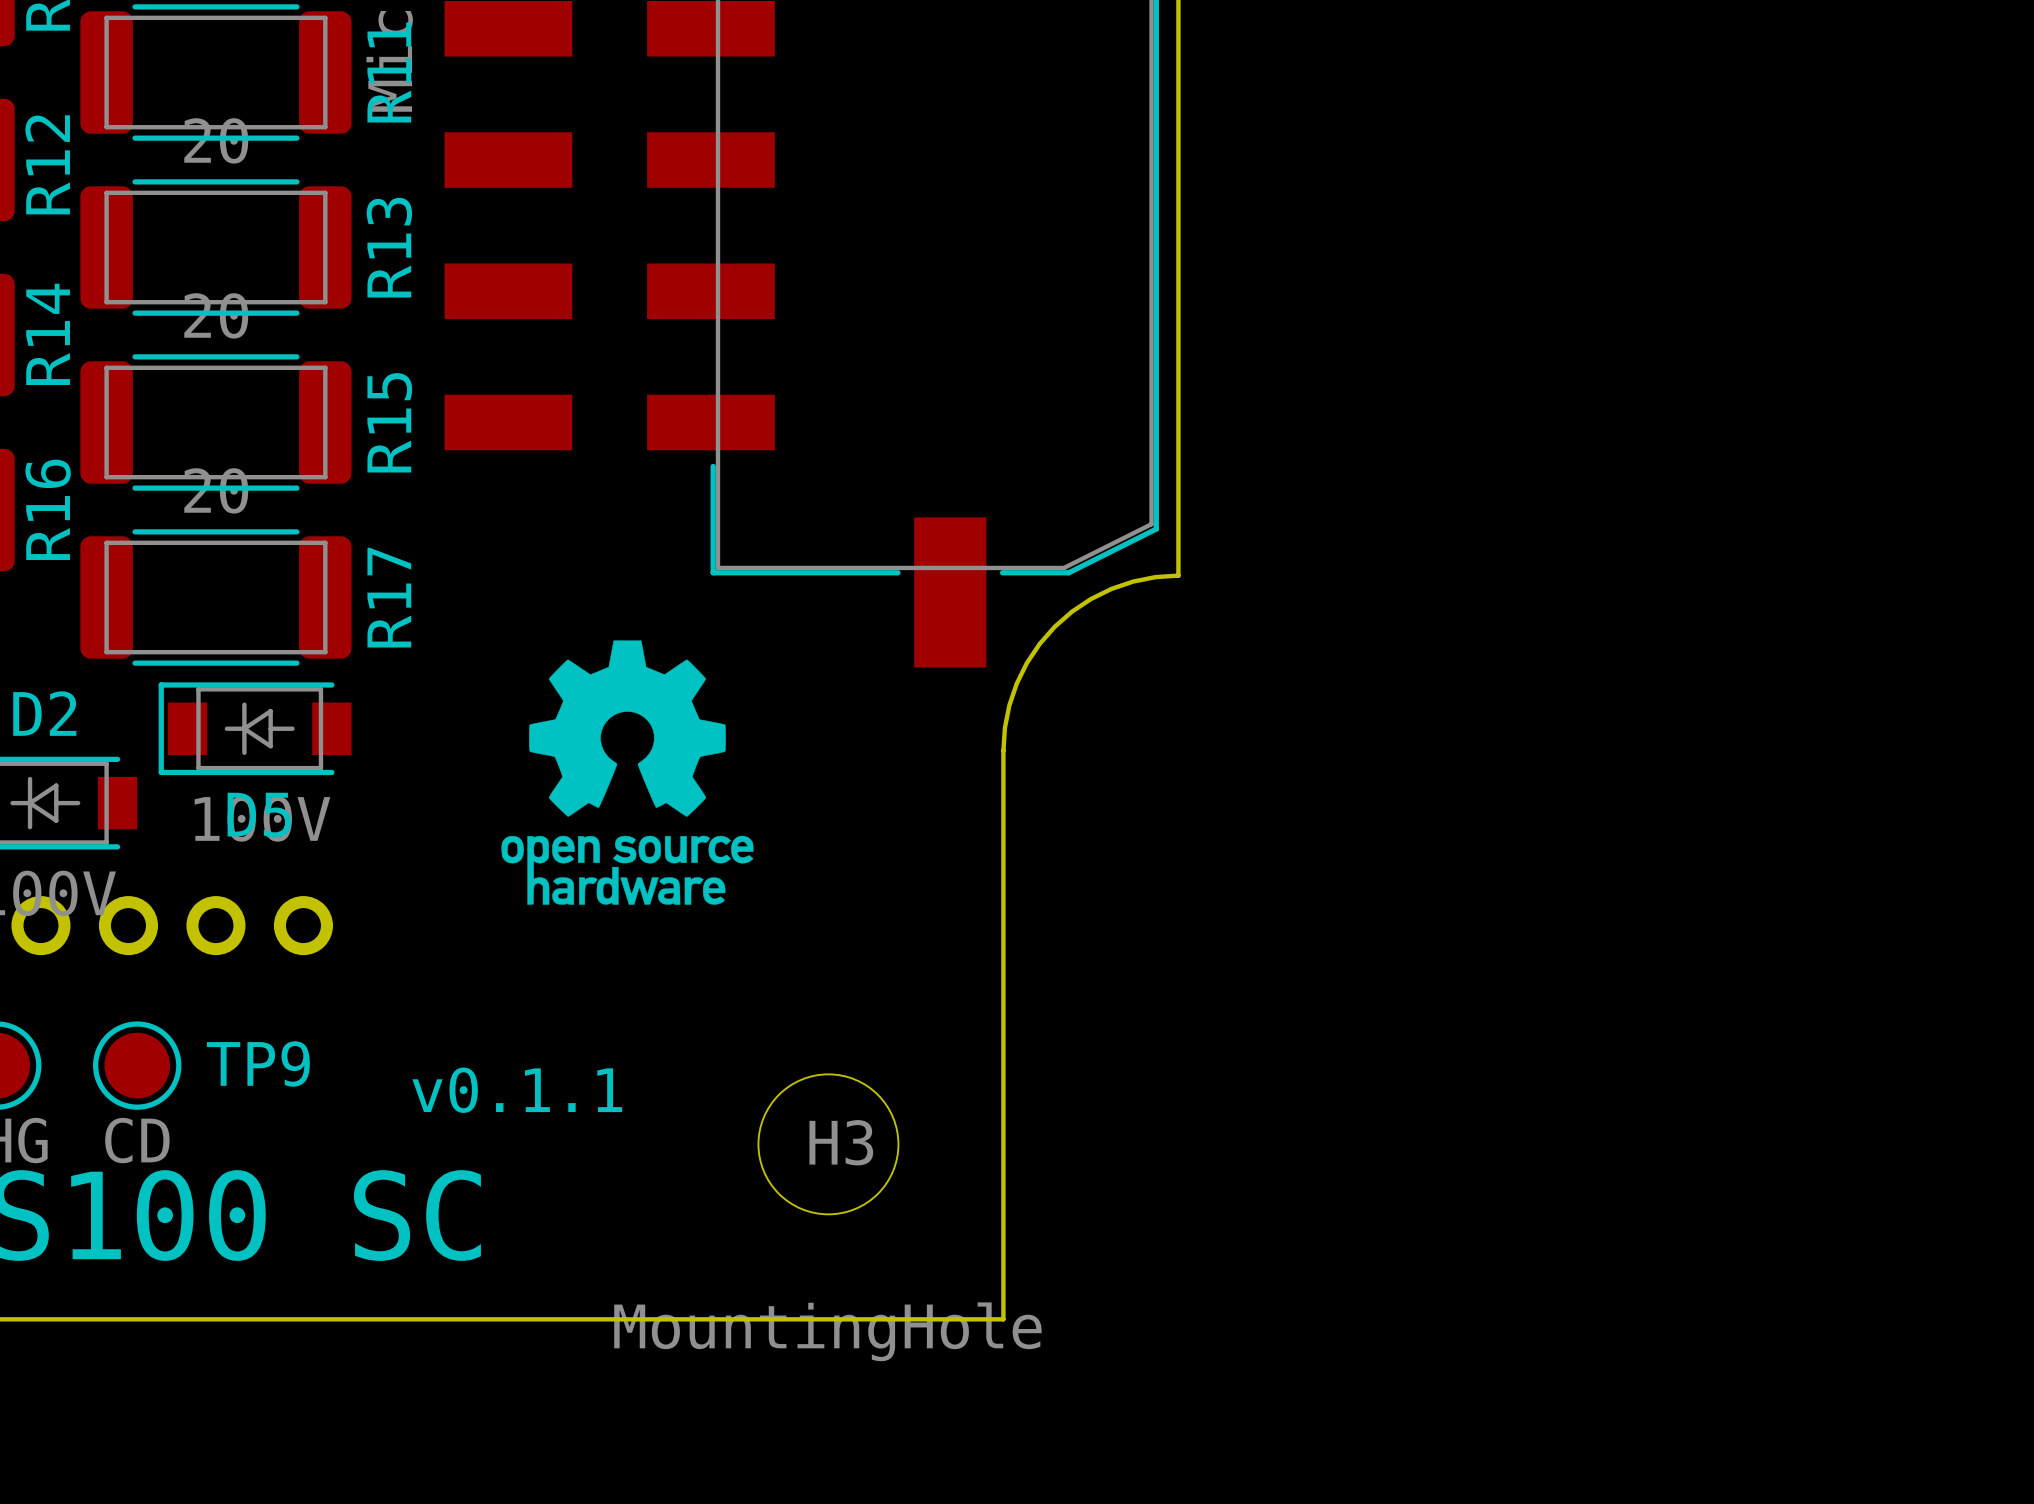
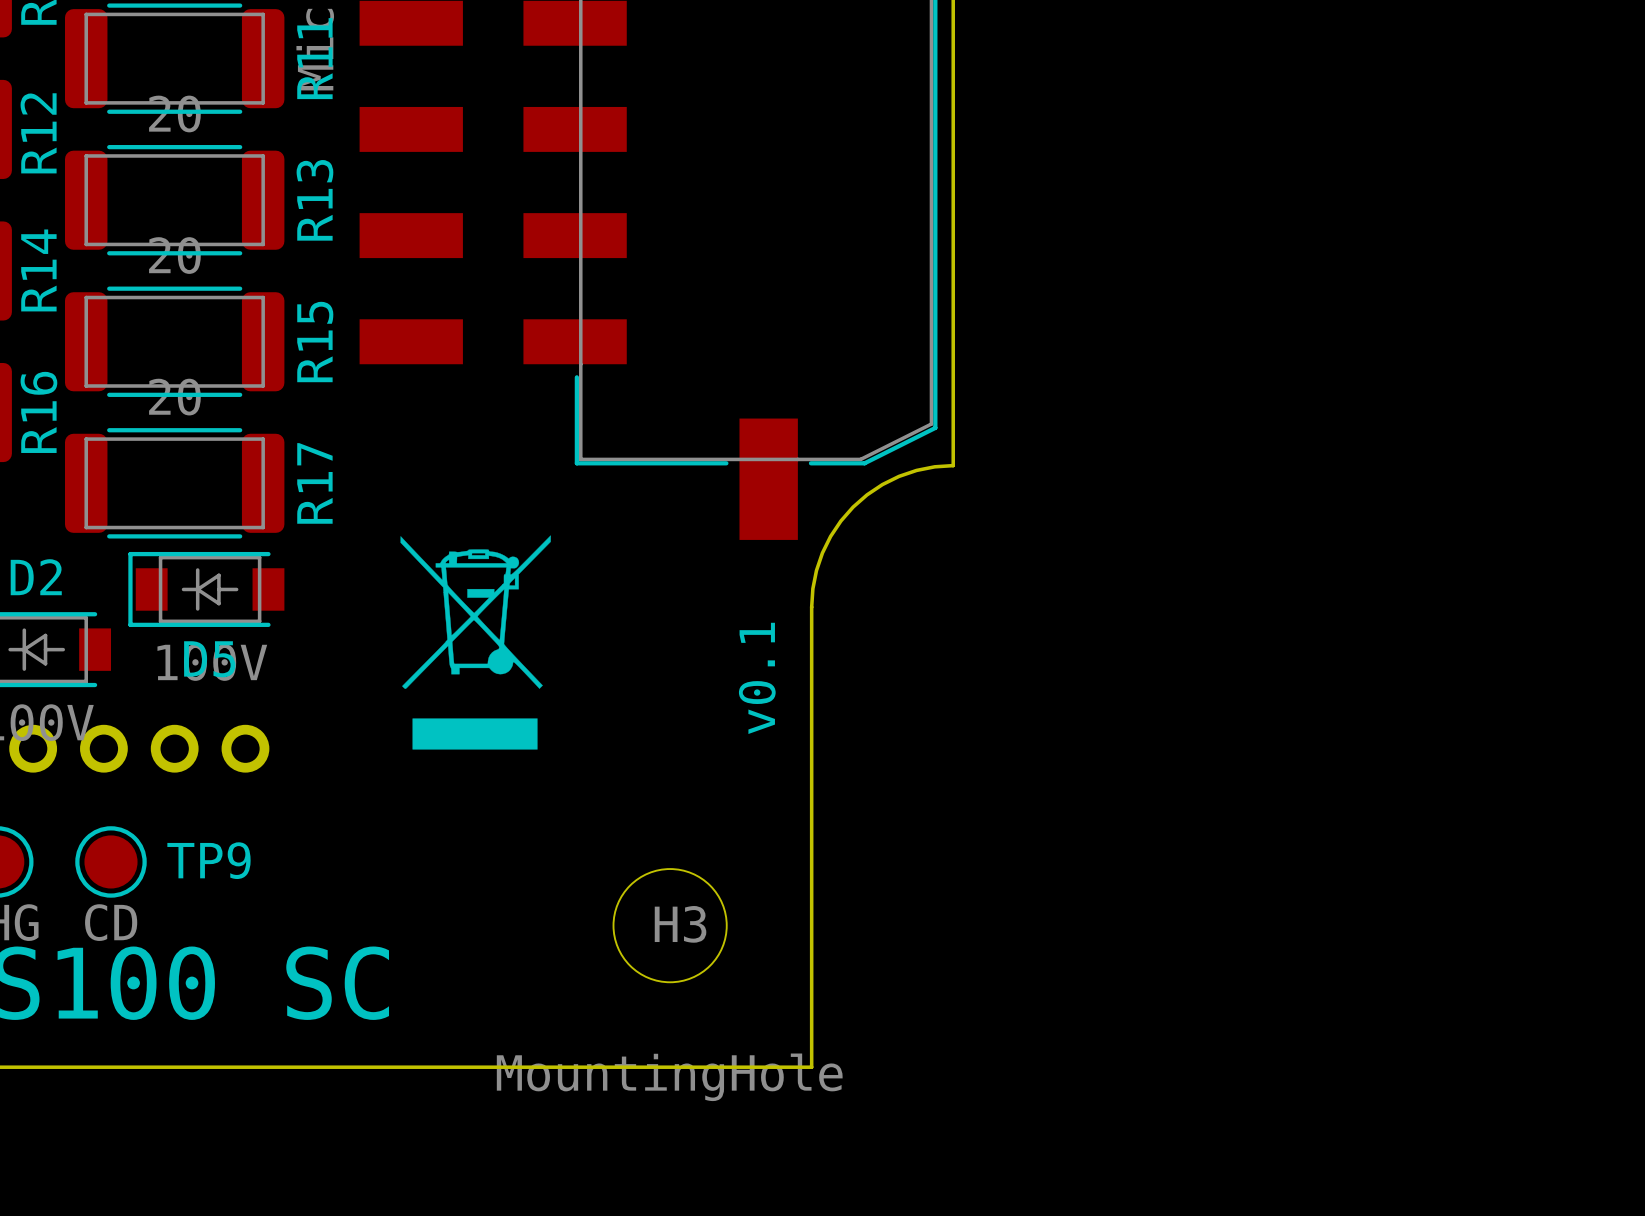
drawing: [501, 640, 754, 905] -> none
drawing: none -> [400, 535, 551, 750]
text: none -> v0.1 (757, 678)
text: v0.1.1 (517, 1090) -> none

